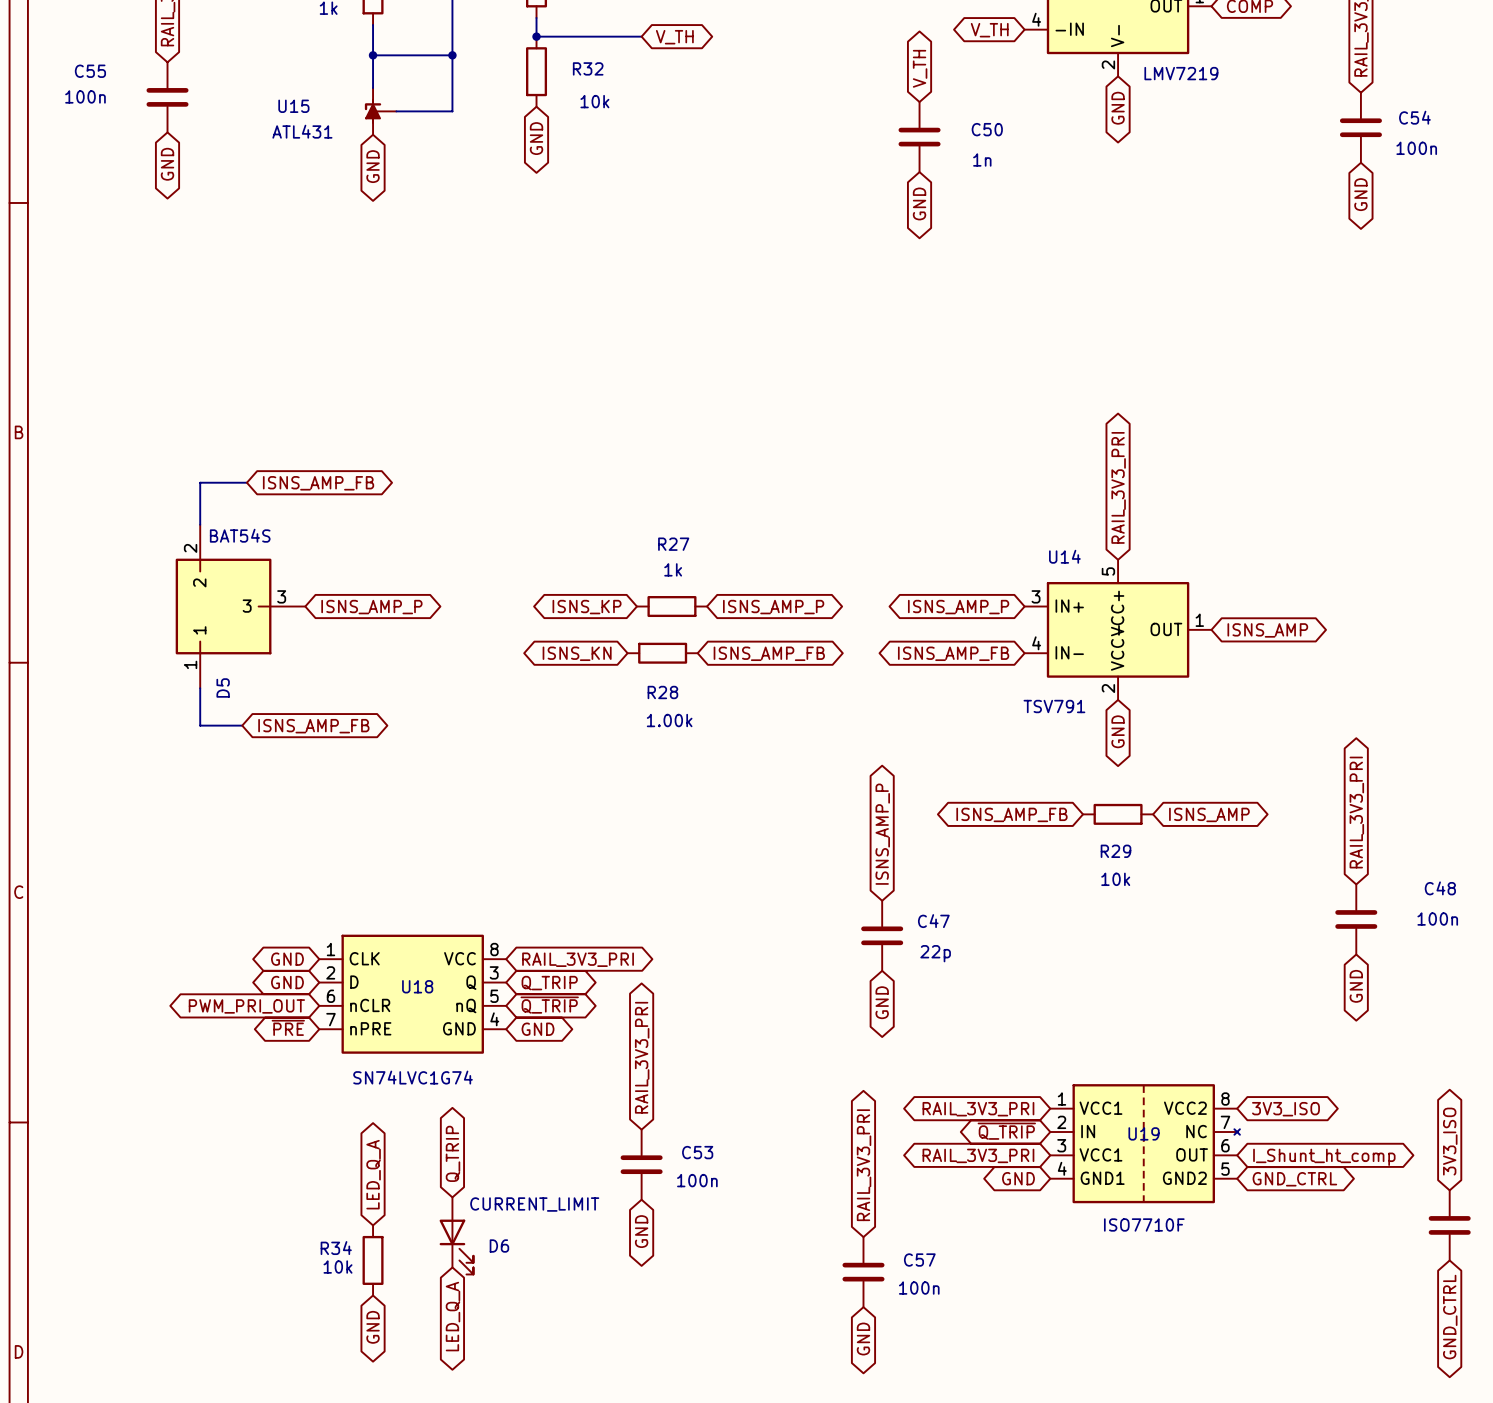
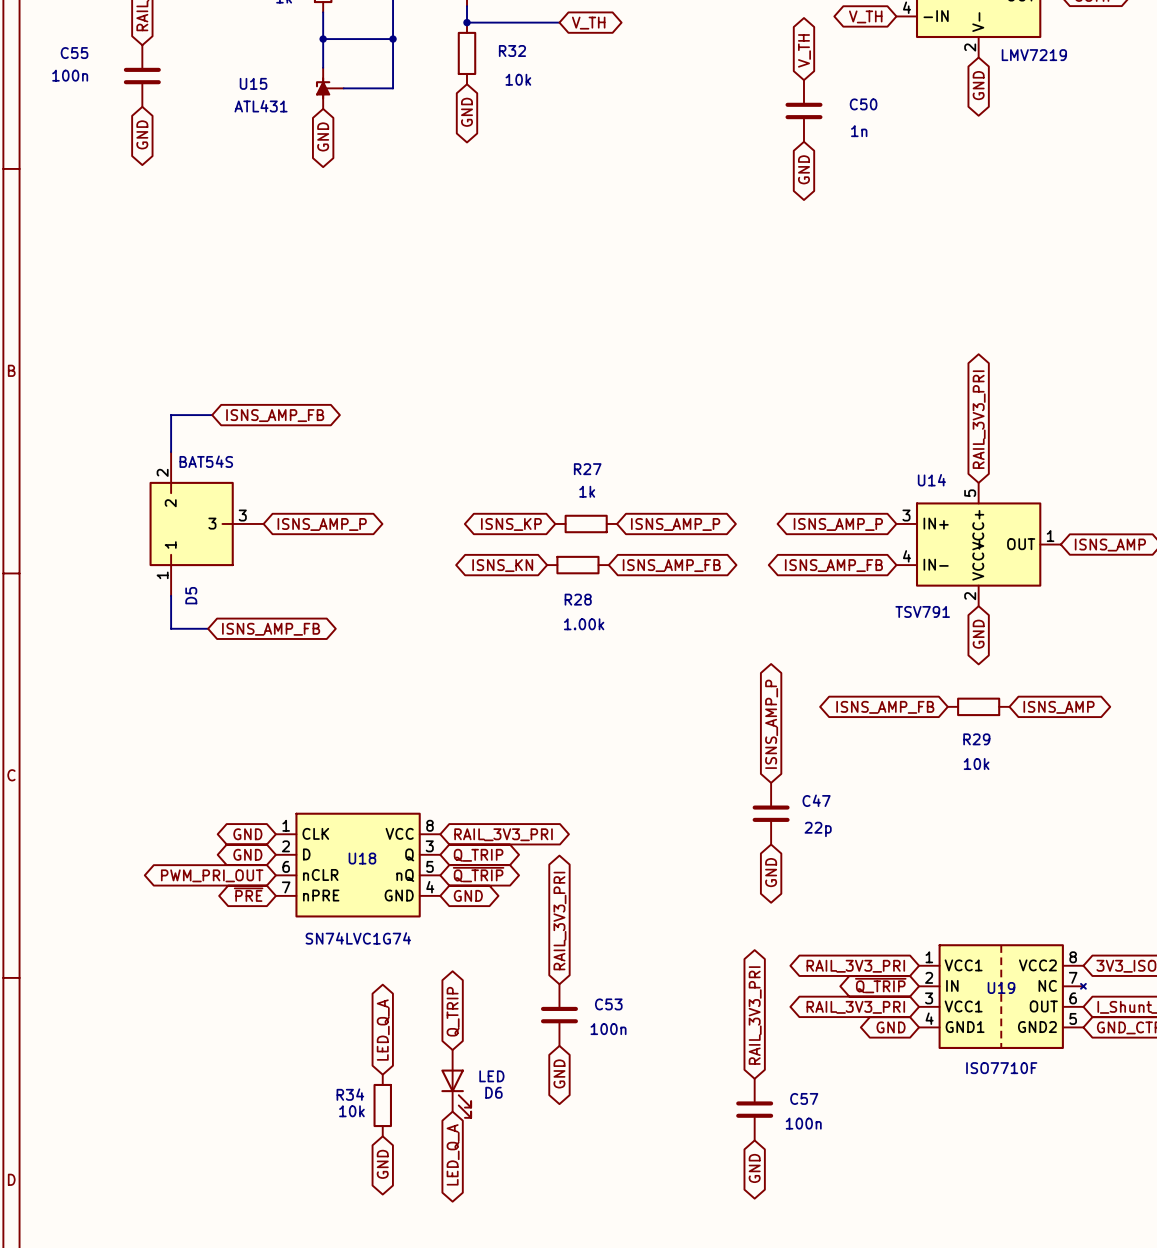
global label position: Q_TRIP (453, 1153) -> Q_TRIP (453, 1011)
global label: LED_Q_A (373, 1174) -> none
global label: none -> LED_Q_A (383, 1030)
D6 value: CURRENT_LIMIT (534, 1204) -> LED (491, 1076)
D6 position: (456, 1235) -> (456, 1083)
R34 position: (373, 1260) -> (382, 1105)
global label: LED_Q_A (453, 1316) -> none
global label: none -> LED_Q_A (453, 1154)
global label position: GND (373, 1327) -> GND (382, 1164)

